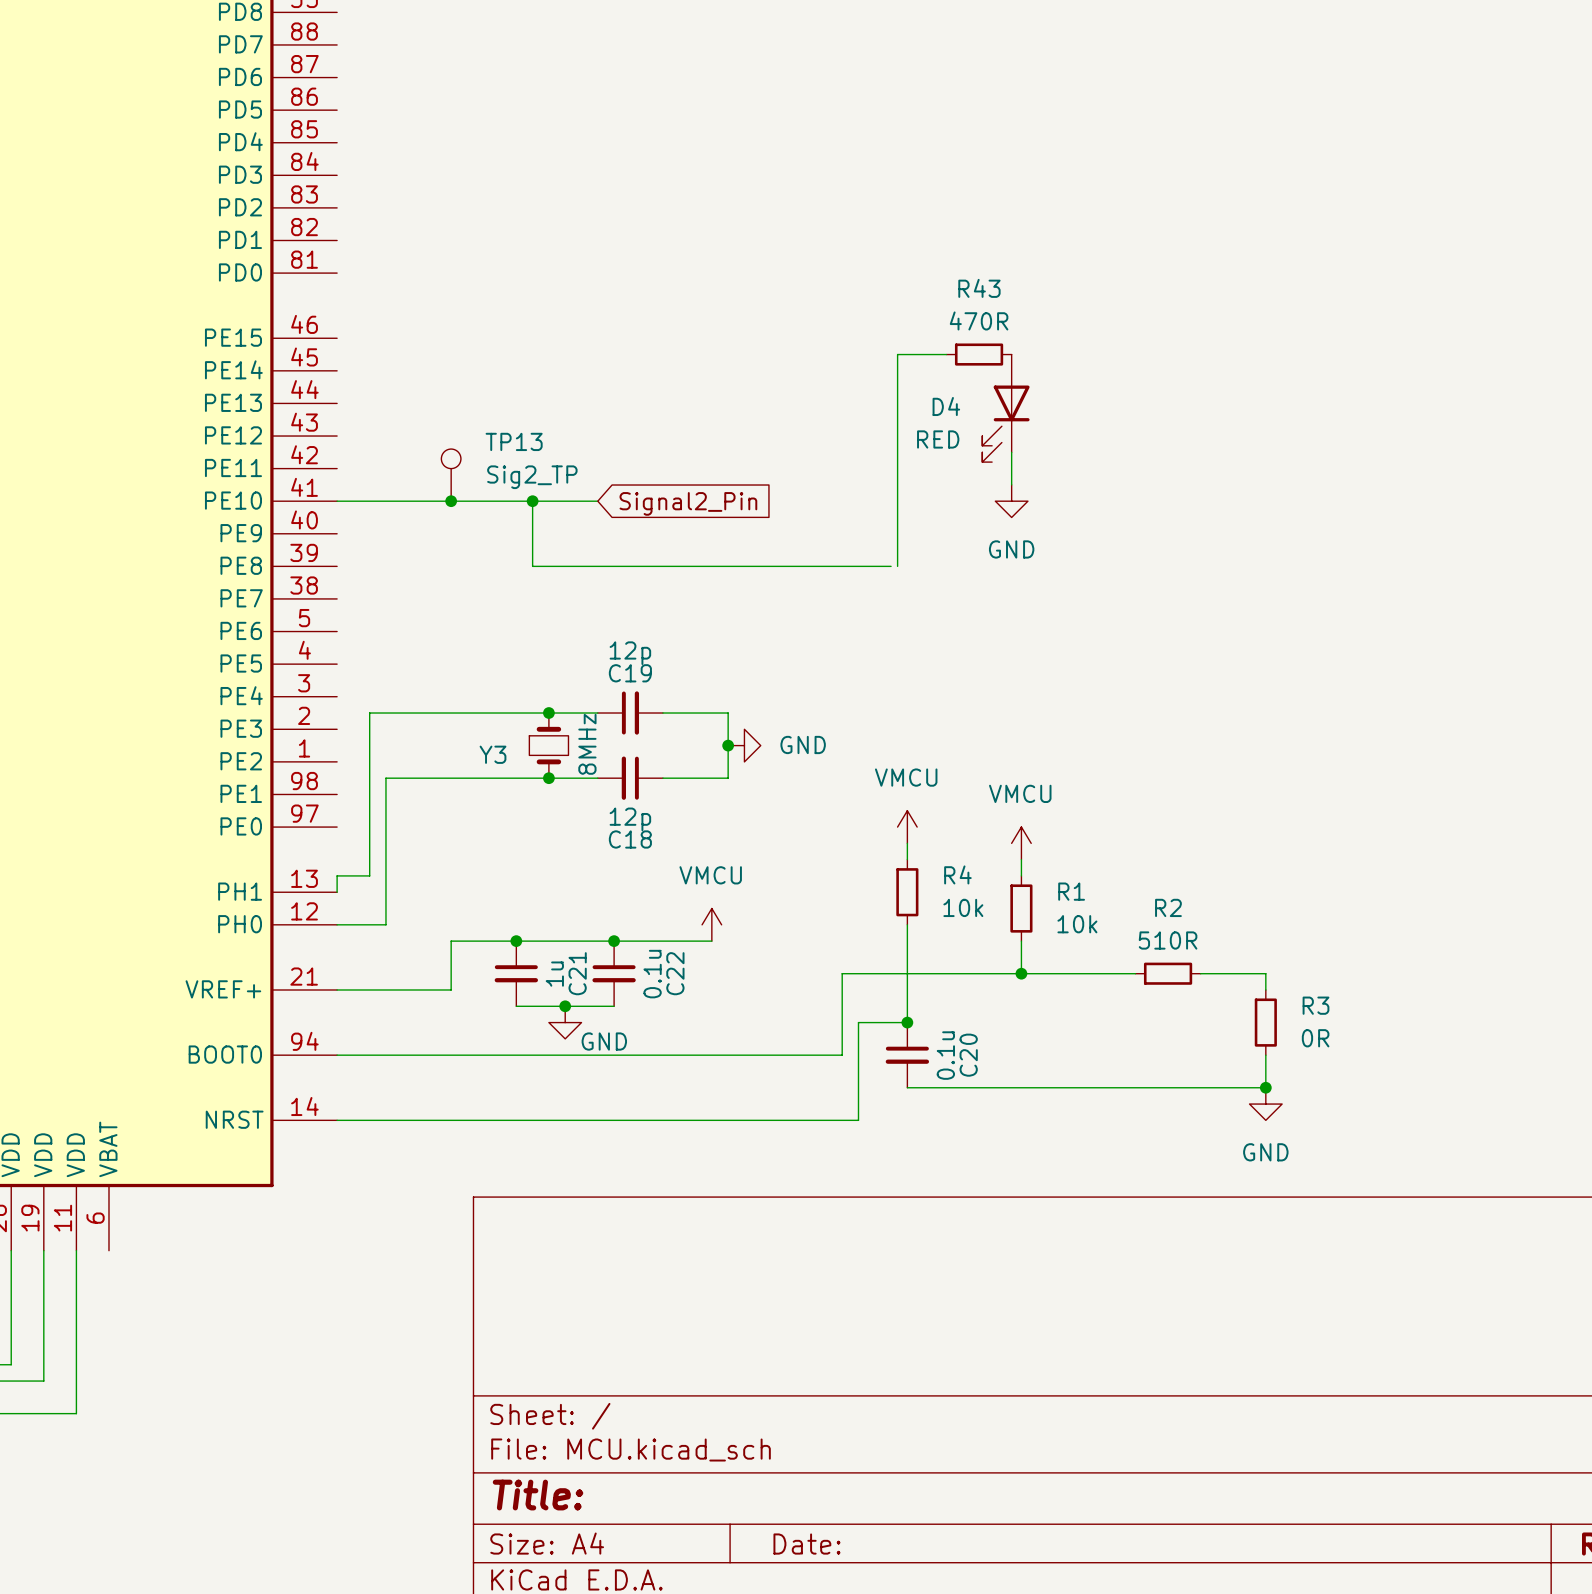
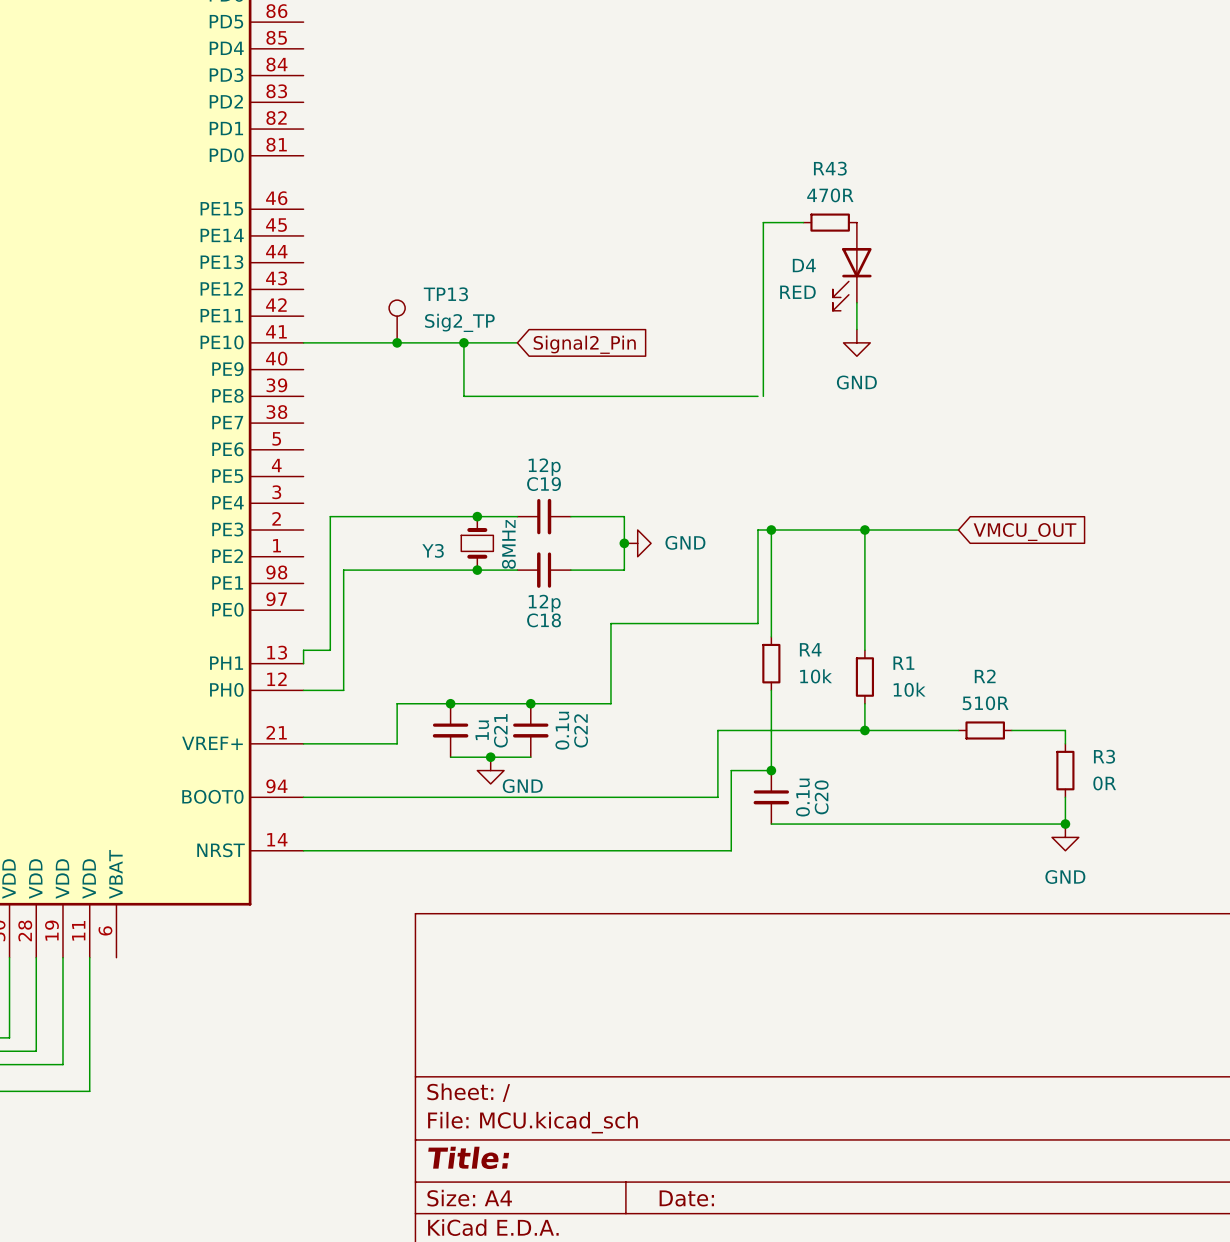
wire: none -> (771, 530) (771, 623)
junction: none -> (771, 530)
wire: none -> (864, 530) (864, 636)
junction: none -> (864, 530)
wire: none -> (958, 530) (758, 530) (758, 623) (610, 623) (610, 703)
global label: none -> VMCU_OUT (1025, 532)
power symbol: VMCU (907, 827) -> none
power symbol: VMCU (1021, 843) -> none
power symbol: VMCU (711, 924) -> none

